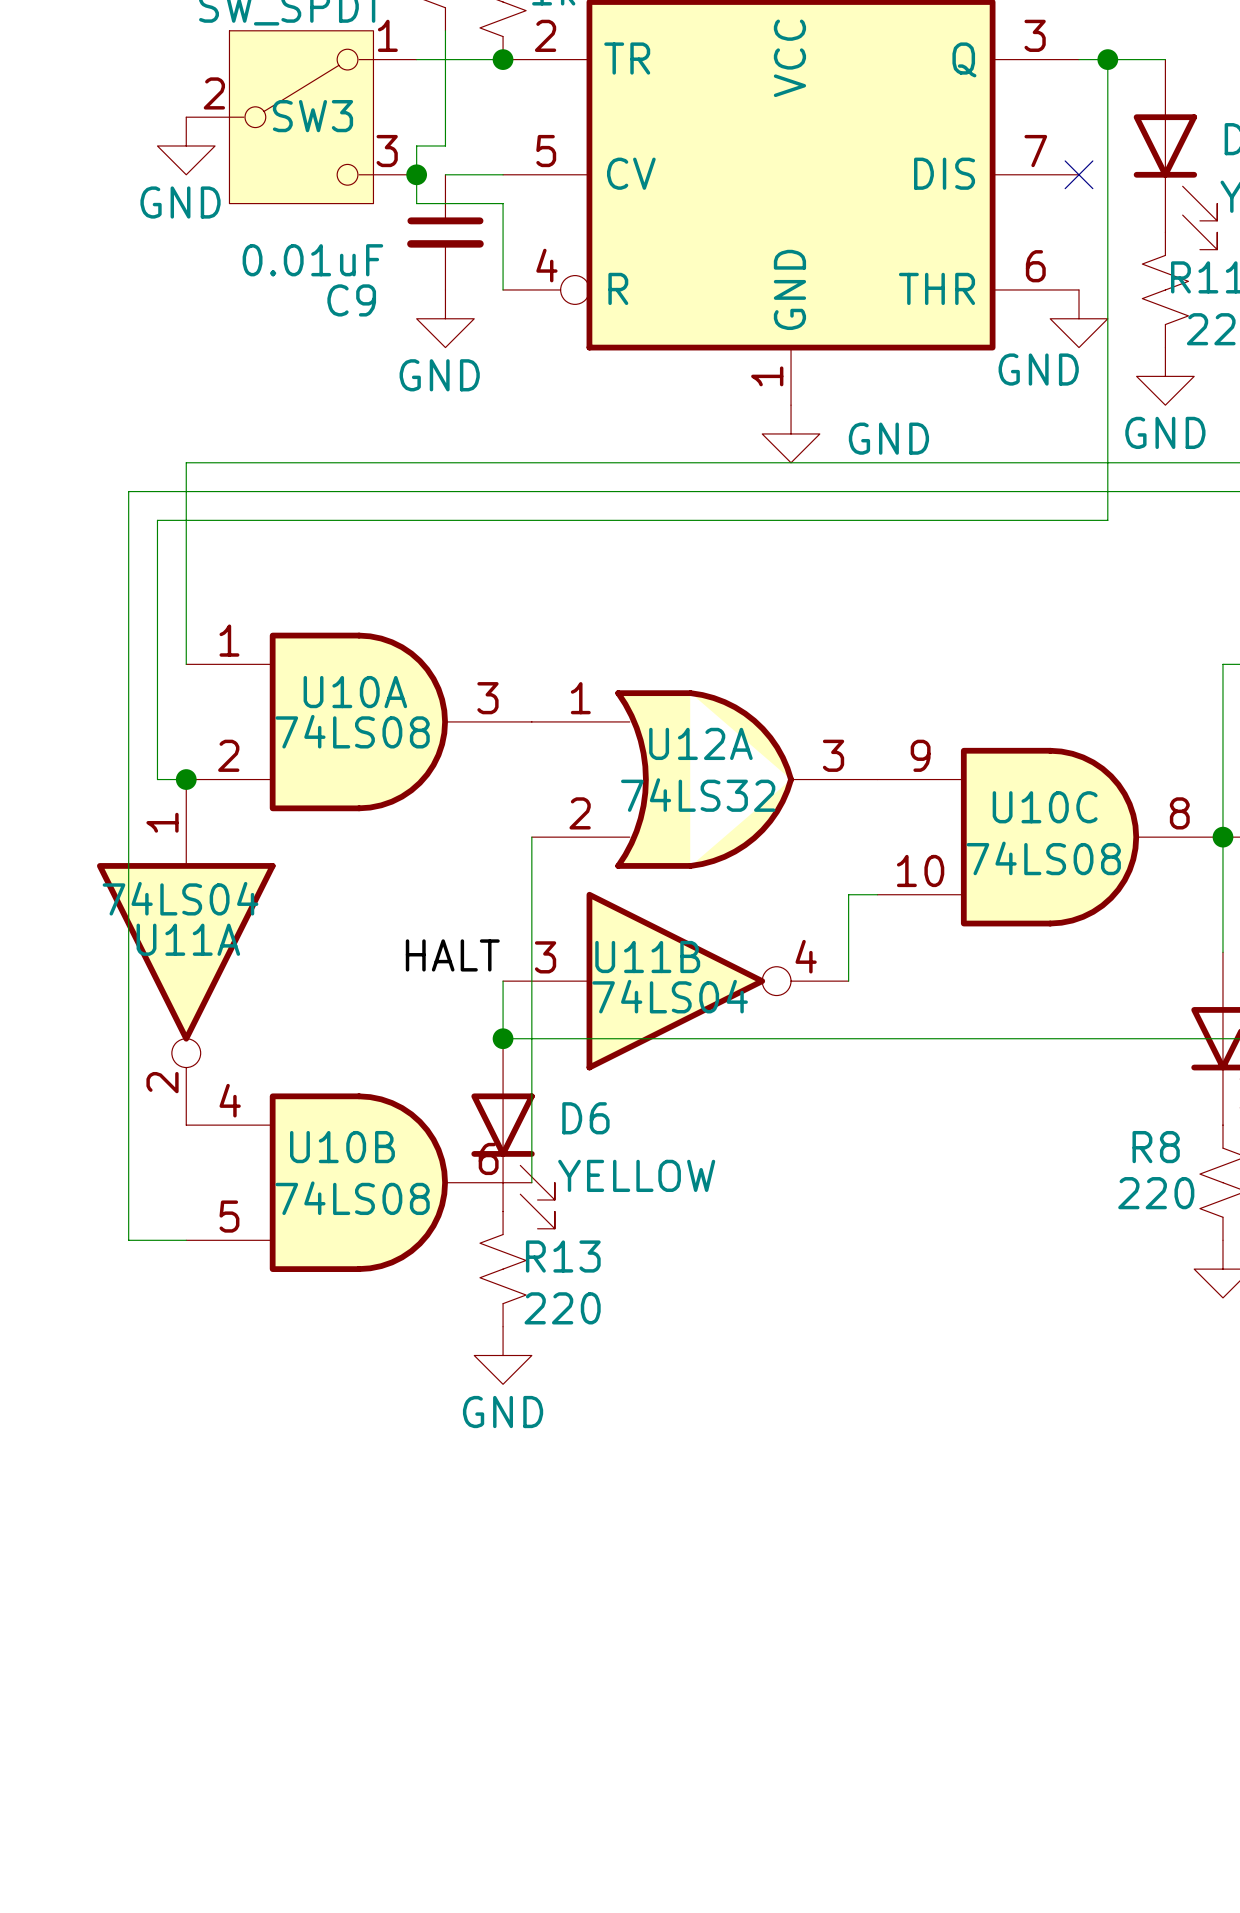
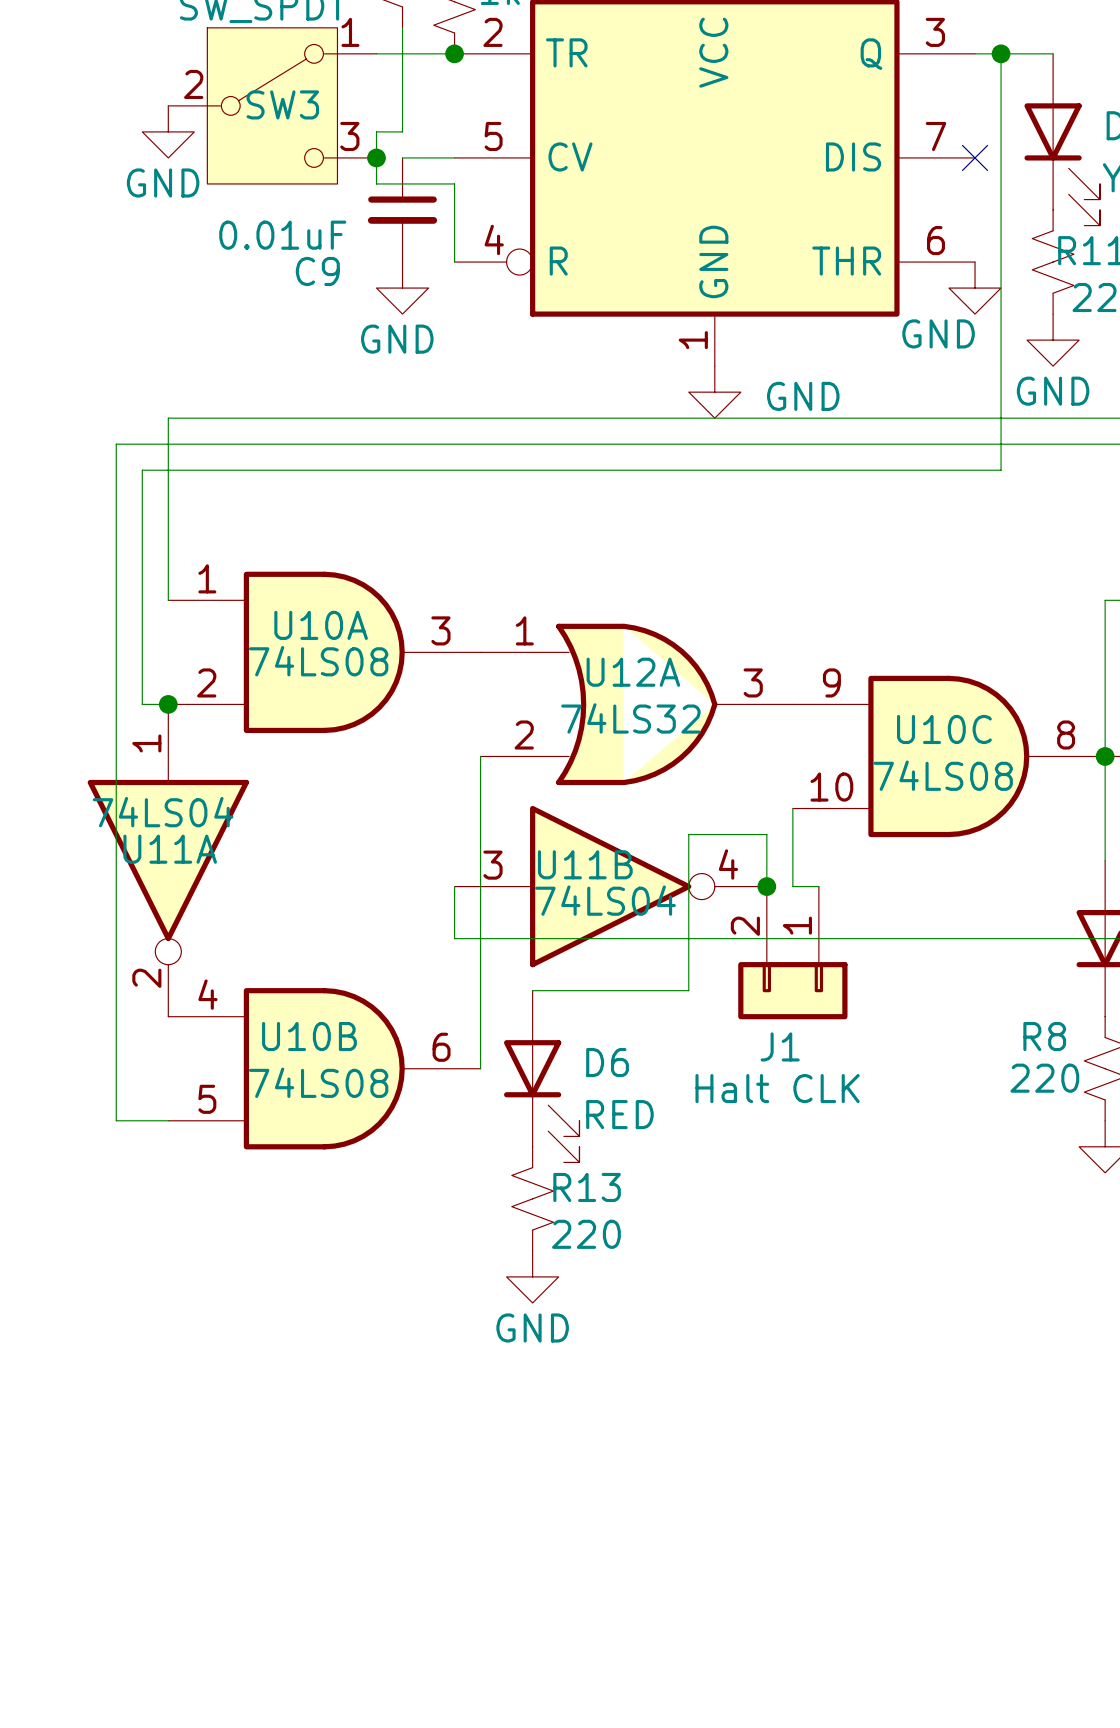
wire: (877, 894) (848, 894) (848, 923) -> (792, 808) (792, 886) (818, 886)
wire: none -> (766, 834) (688, 834) (688, 990) (532, 990)
label: HALT (452, 955) -> none
junction: none -> (766, 886)
junction: (503, 1038) -> none
J1: none -> Halt CLK (792, 952)
D6 position: (513, 1133) -> (541, 1076)
D6 value: YELLOW (636, 1175) -> RED (619, 1114)
R13 position: (503, 1269) -> (532, 1198)
power symbol position: GND (503, 1355) -> GND (532, 1276)

